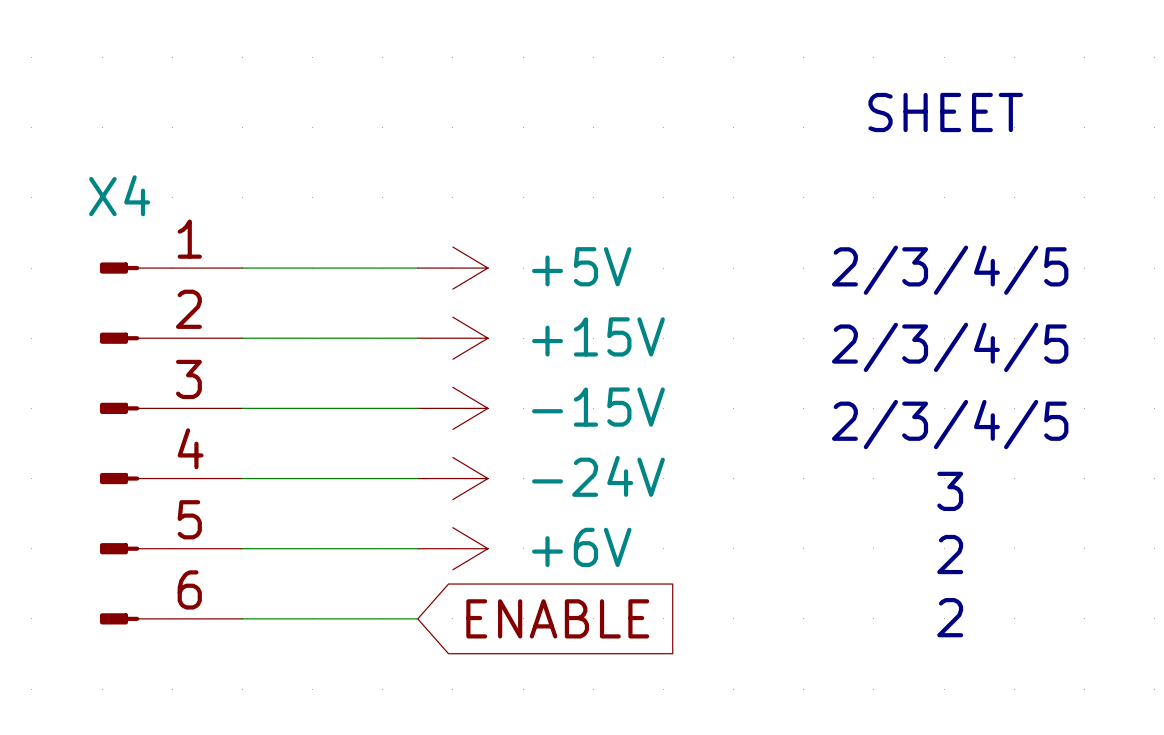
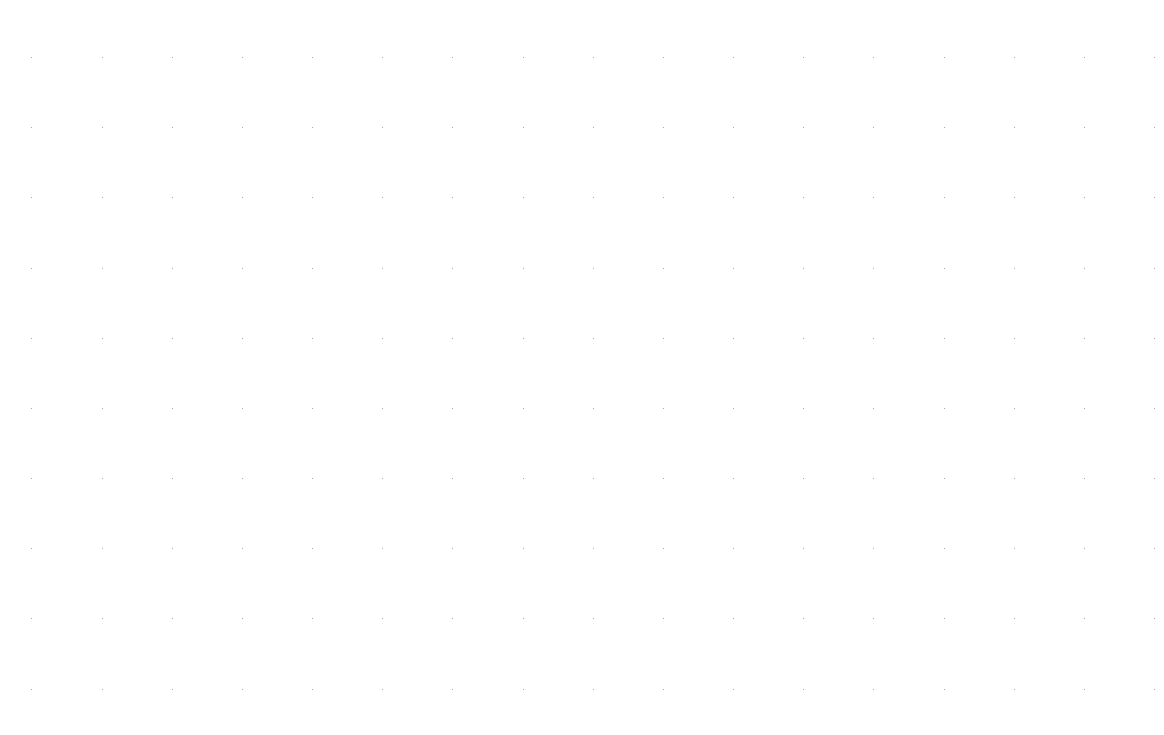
text: SHEET (945, 112) -> none
wire: (242, 268) (417, 268) -> none
power symbol: +5V (452, 268) -> none
text: 2/3/4/5 (950, 270) -> none
wire: (242, 338) (417, 338) -> none
power symbol: +15V (452, 338) -> none
text: 2/3/4/5 (950, 347) -> none
wire: (242, 408) (417, 408) -> none
power symbol: -15V (452, 408) -> none
text: 2/3/4/5 (950, 424) -> none
X4: (171, 443) -> none
wire: (242, 478) (417, 478) -> none
power symbol: -24V (452, 478) -> none
text: 3 (950, 491) -> none
wire: (242, 548) (417, 548) -> none
power symbol: +6V (452, 548) -> none
text: 2 (950, 554) -> none
text: 2 (950, 617) -> none
wire: (242, 618) (417, 618) -> none
global label: ENABLE (557, 618) -> none

